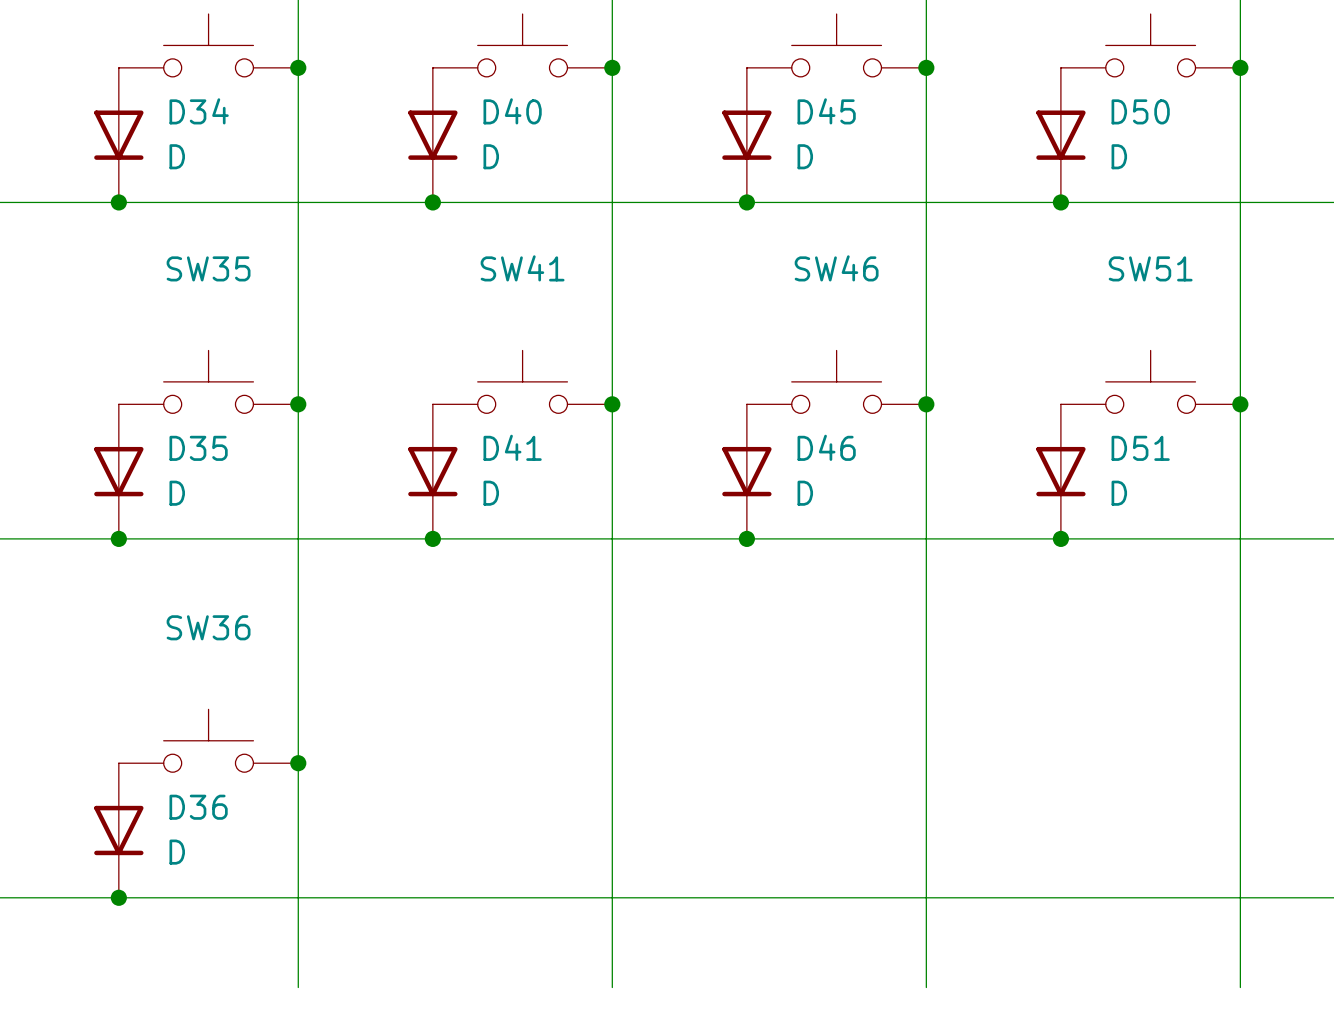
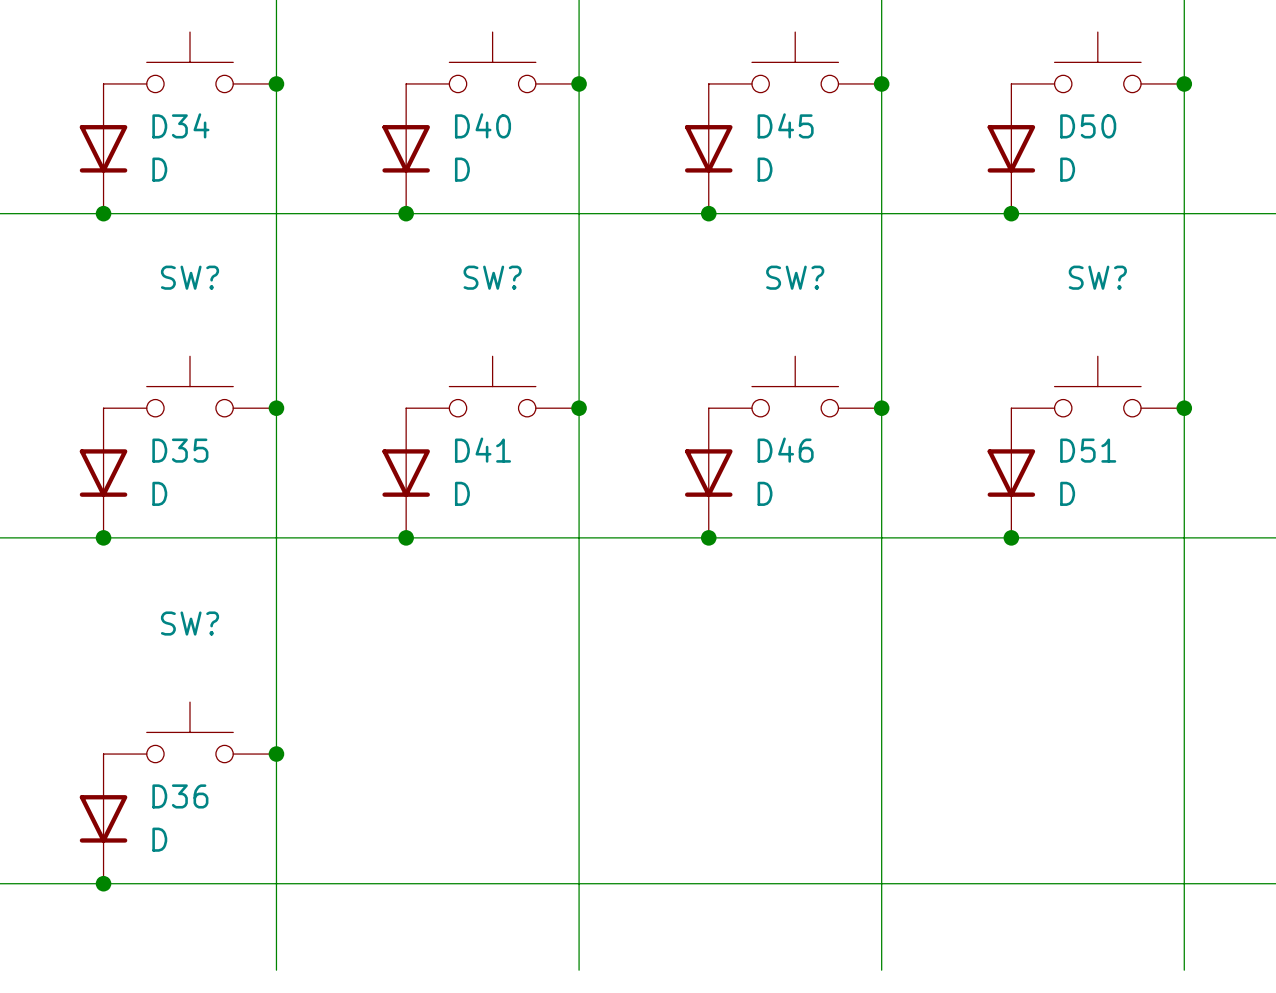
SW35 name: SW35 (208, 268) -> SW? (190, 277)
SW41 name: SW41 (522, 268) -> SW? (492, 277)
SW46 name: SW46 (836, 268) -> SW? (795, 277)
SW51 name: SW51 (1150, 268) -> SW? (1097, 277)
SW36 name: SW36 (208, 627) -> SW? (190, 623)

